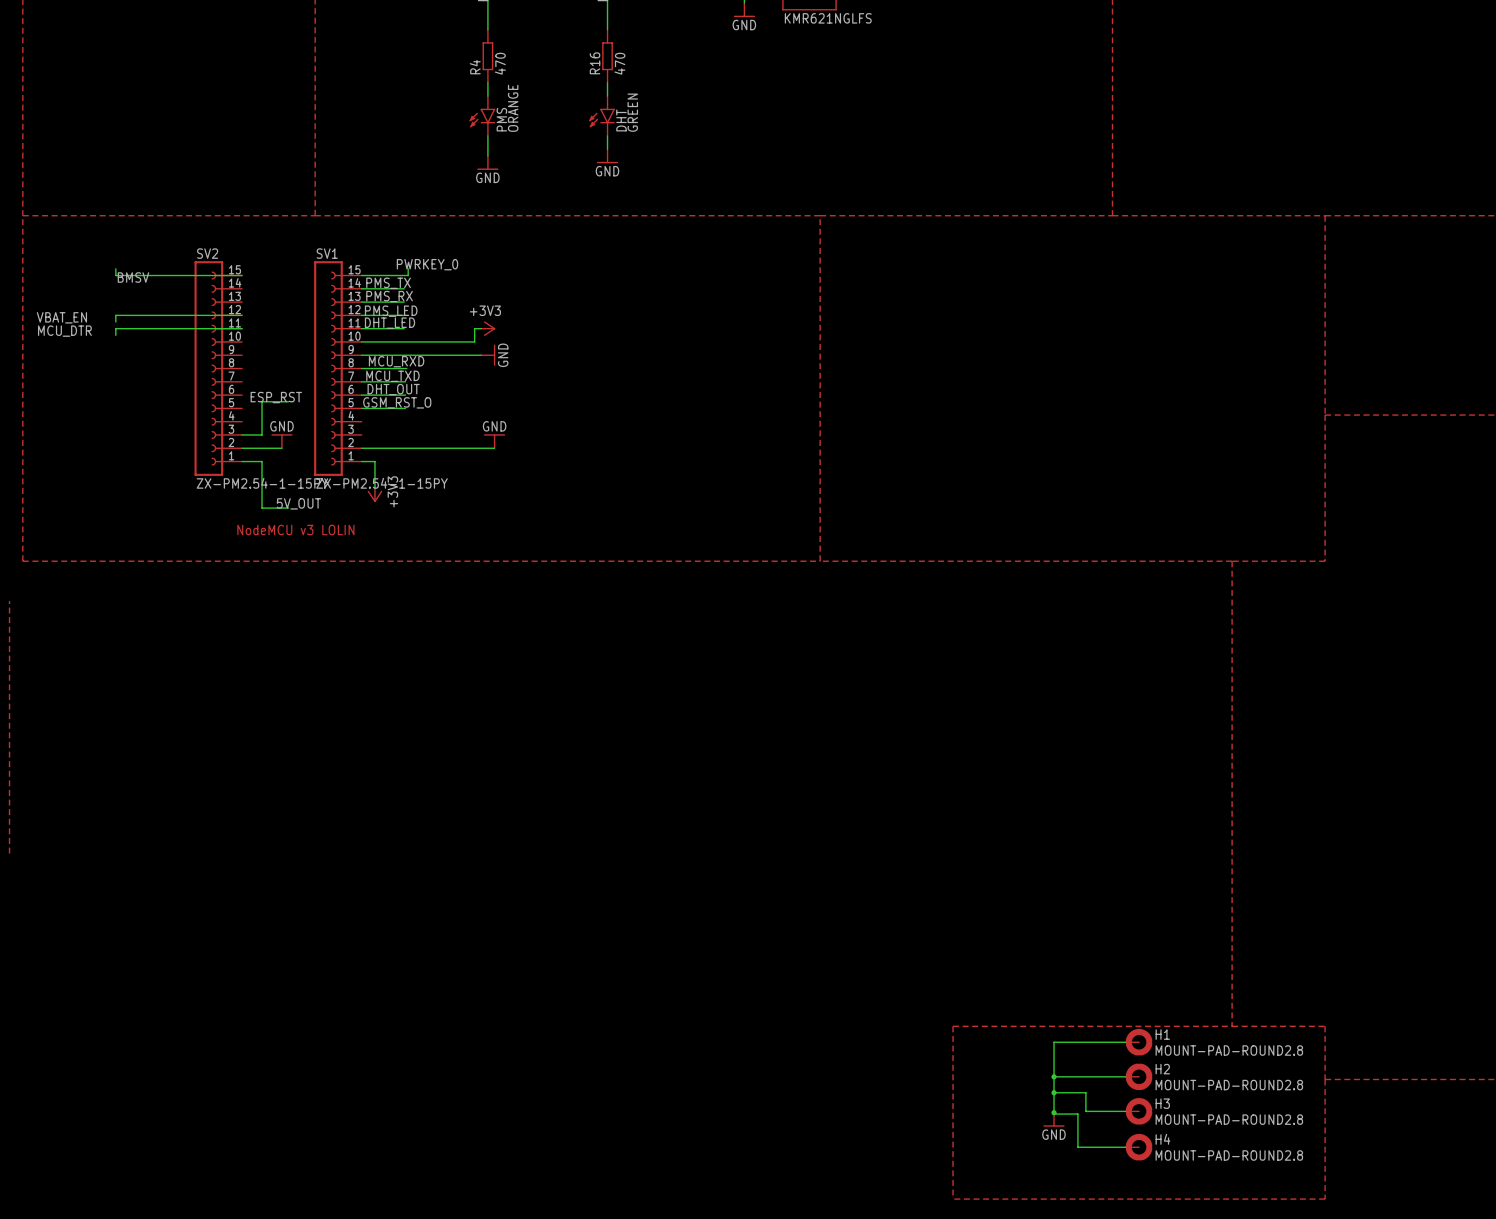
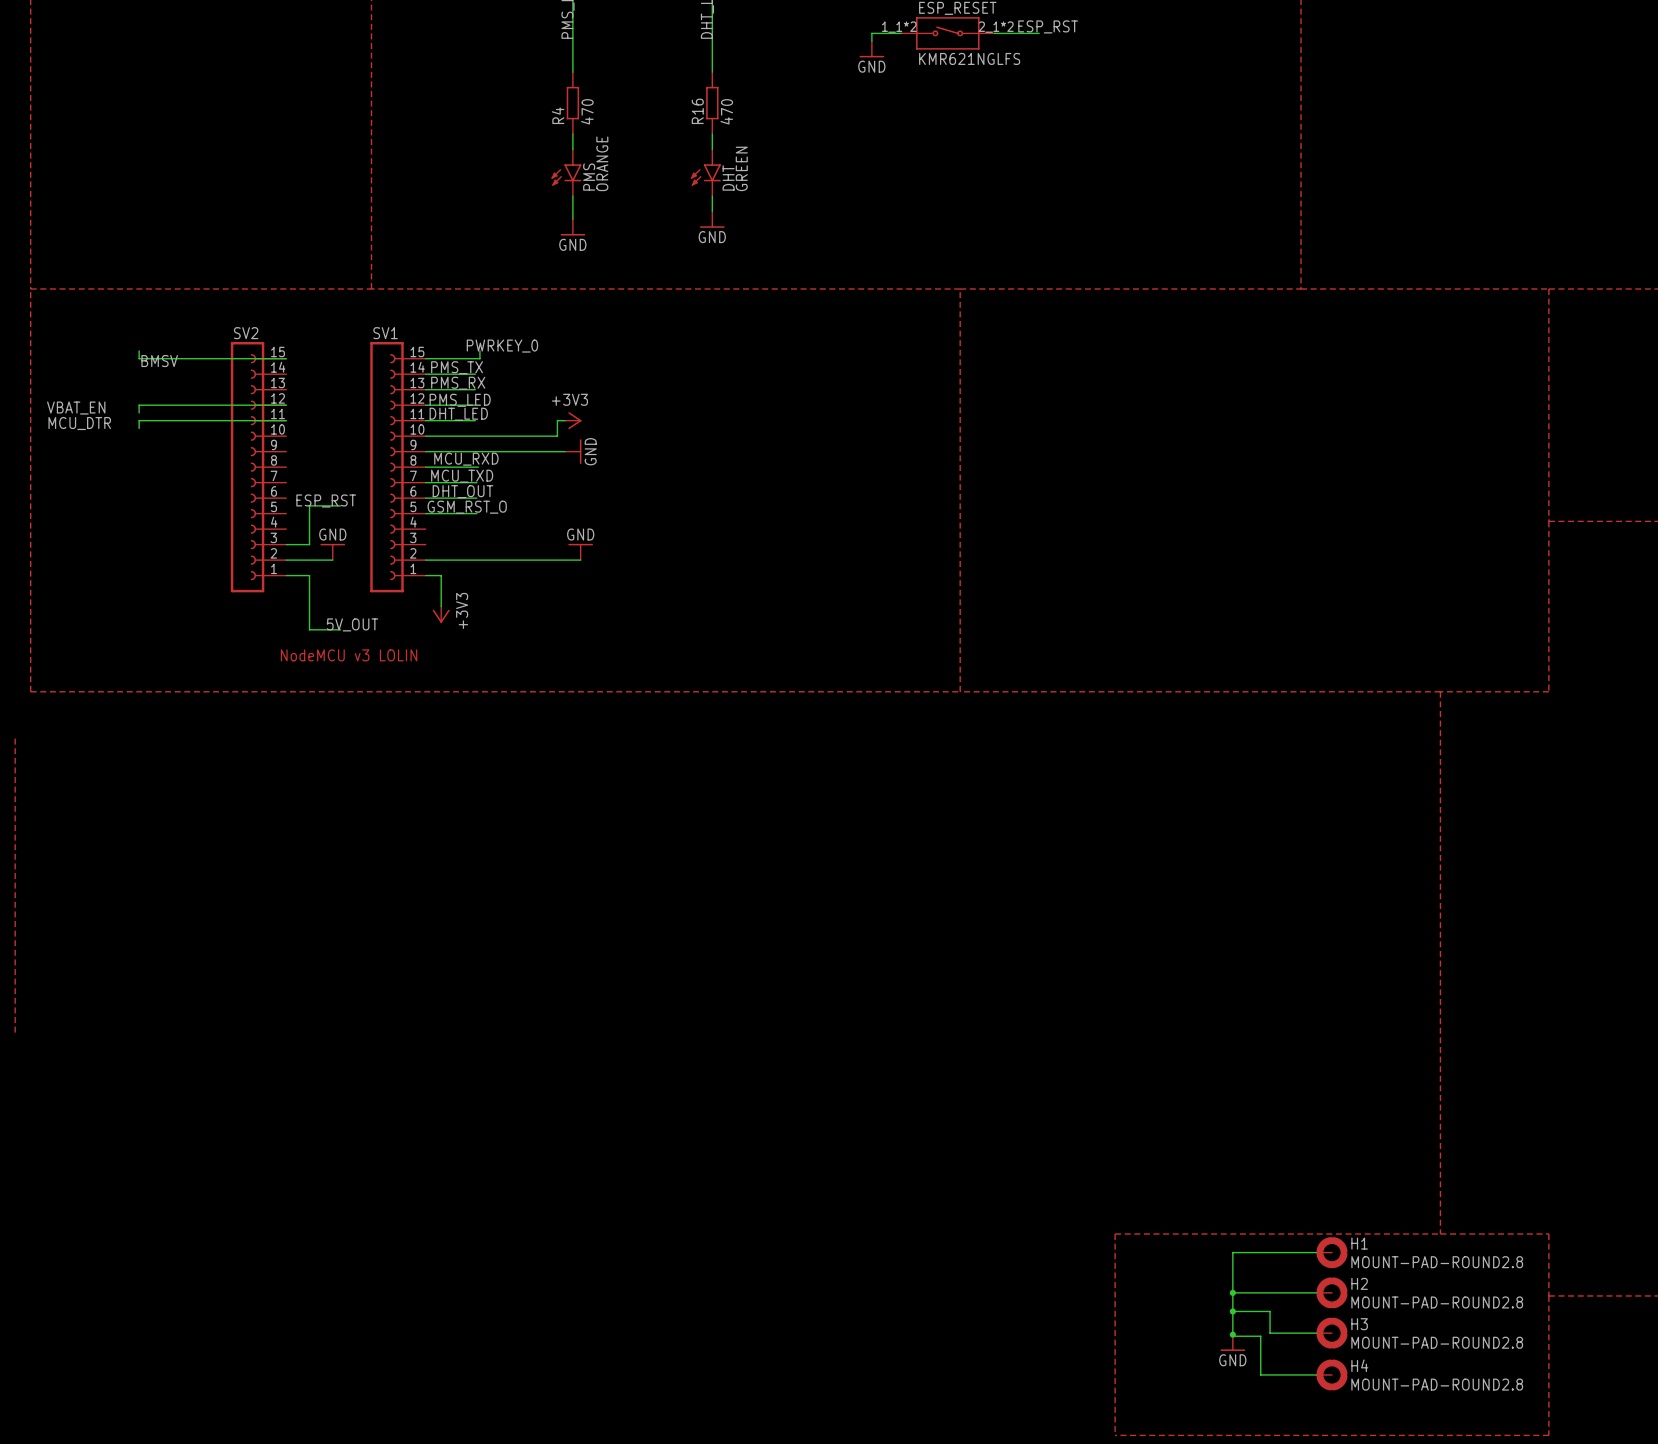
SV2 value: ZX-PM2.54-1-15PY (262, 483) -> none
SV1 value: ZX-PM2.54-1-15PY (382, 483) -> none

